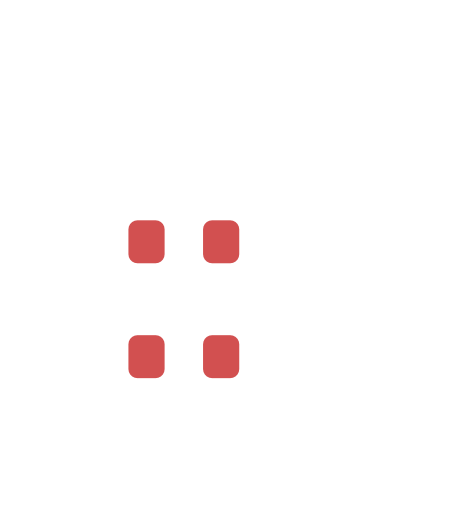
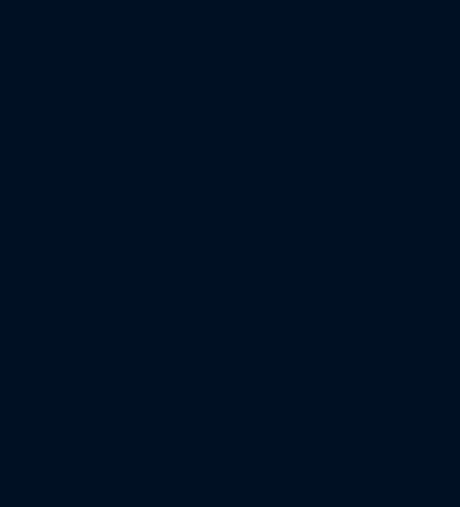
part: (183, 241) -> none
part: (183, 356) -> none

